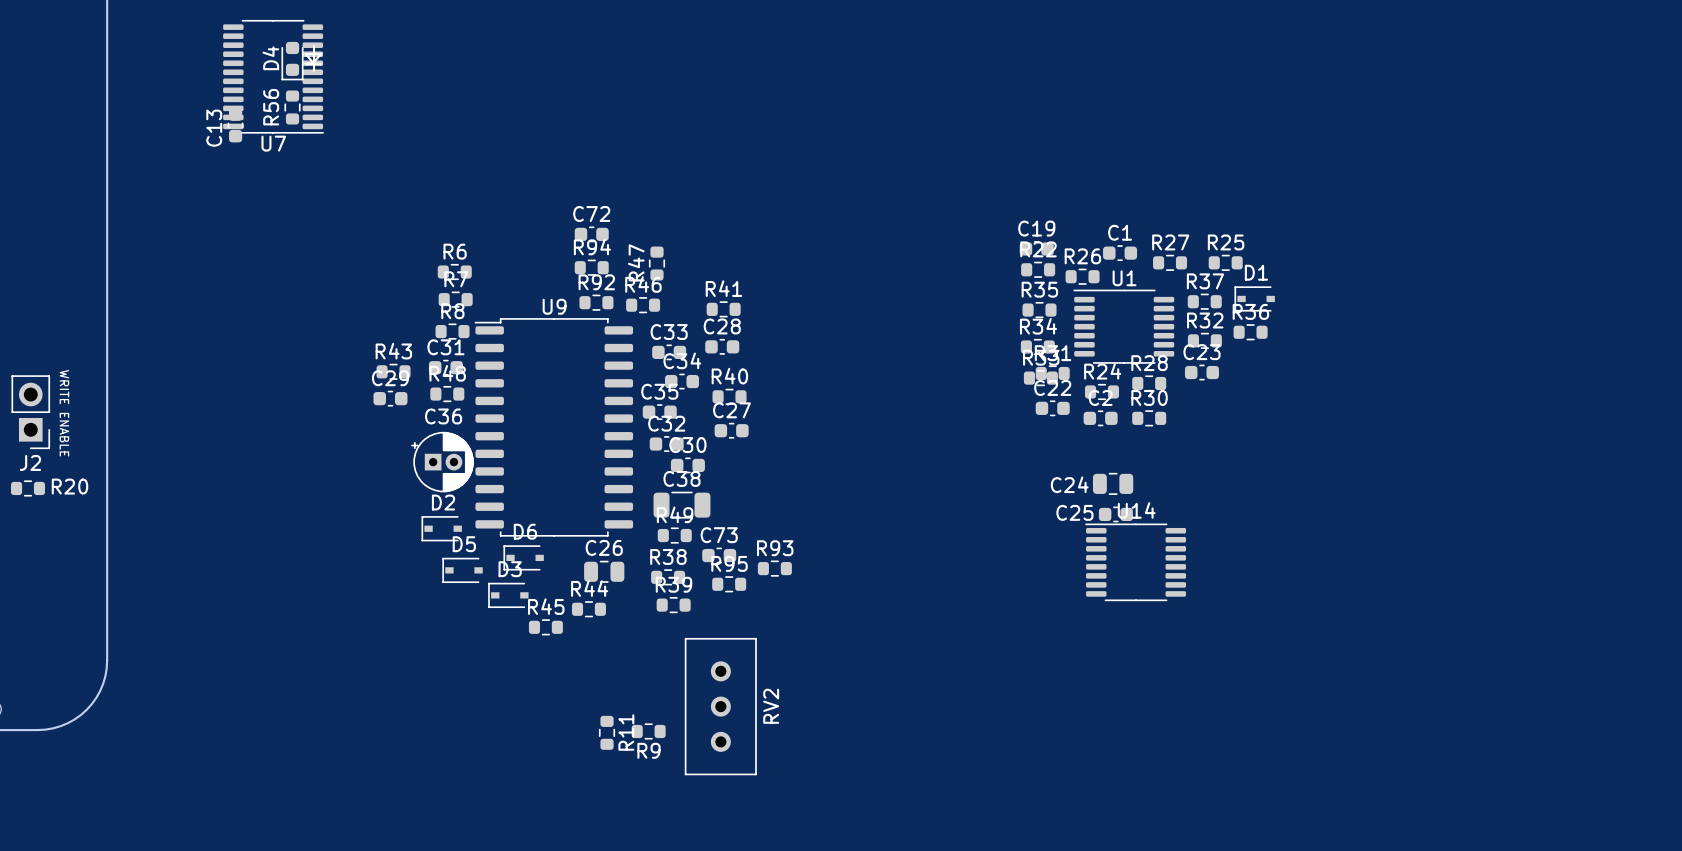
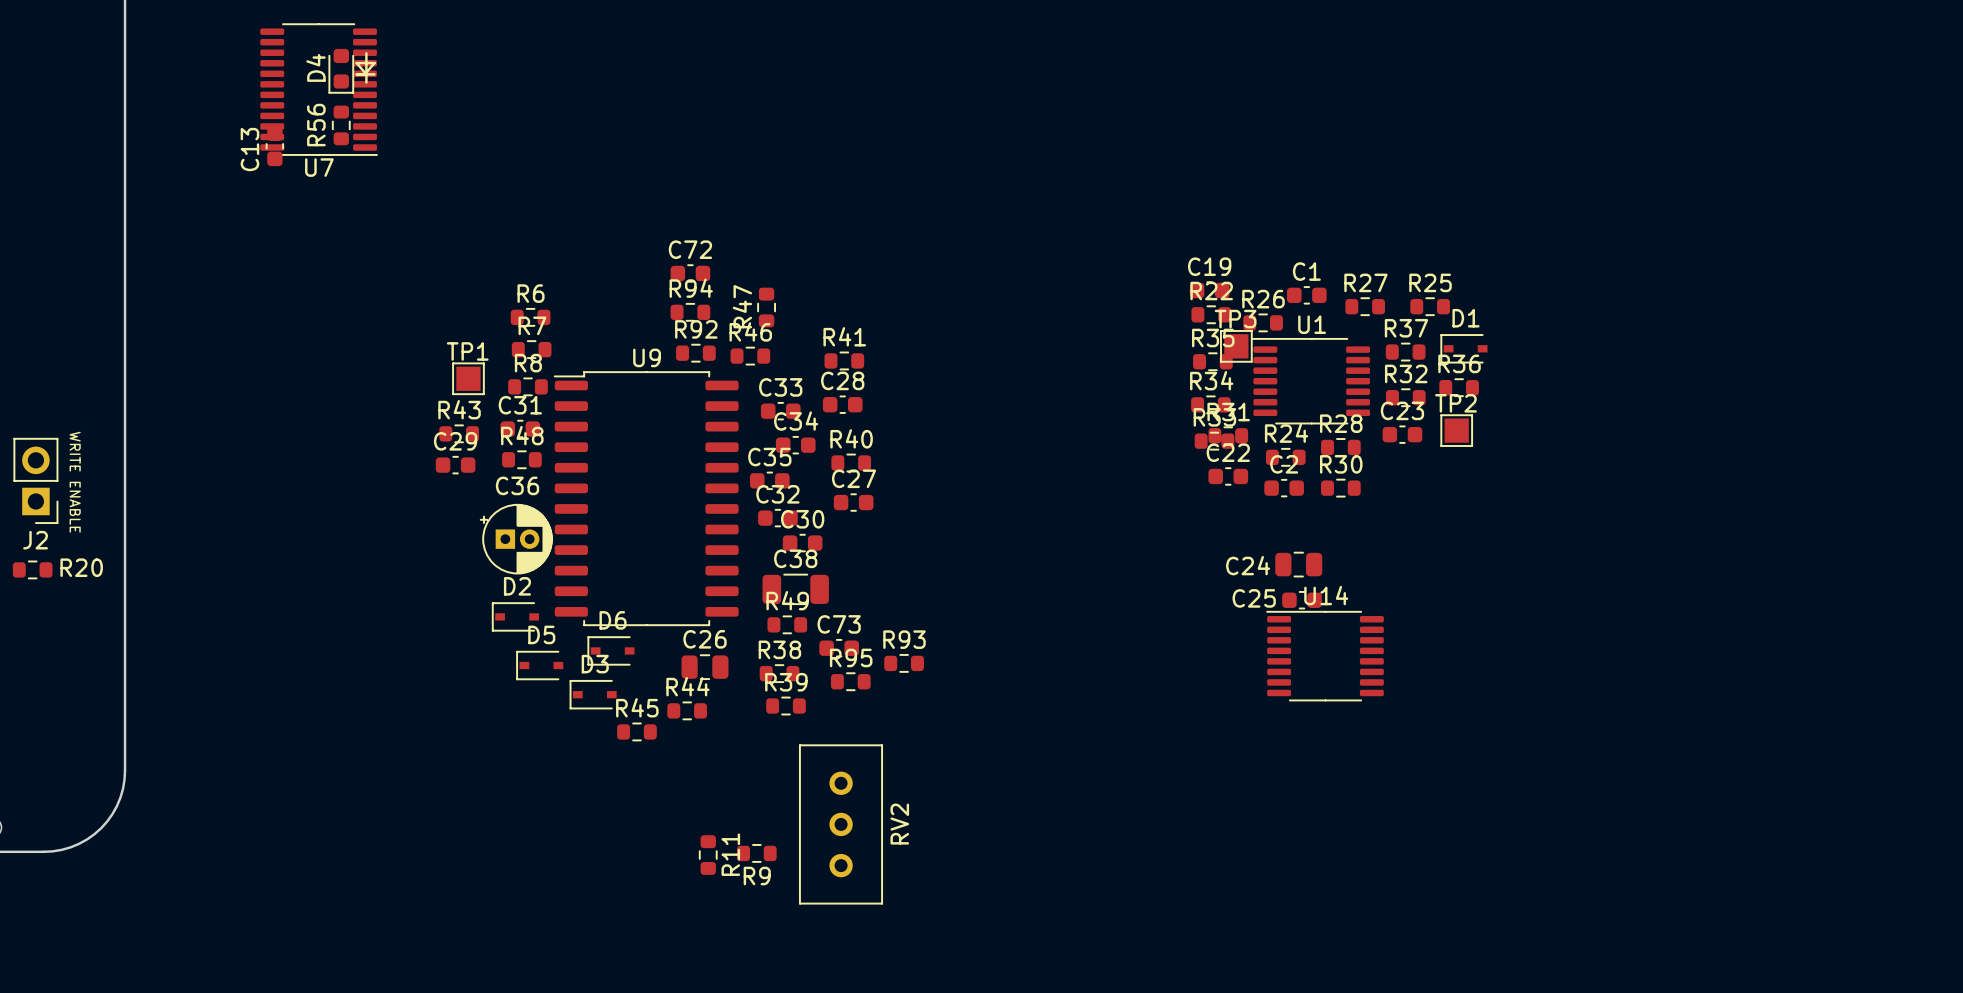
TP3: none -> (1236, 346)
TP1: none -> (468, 378)
TP2: none -> (1456, 430)

